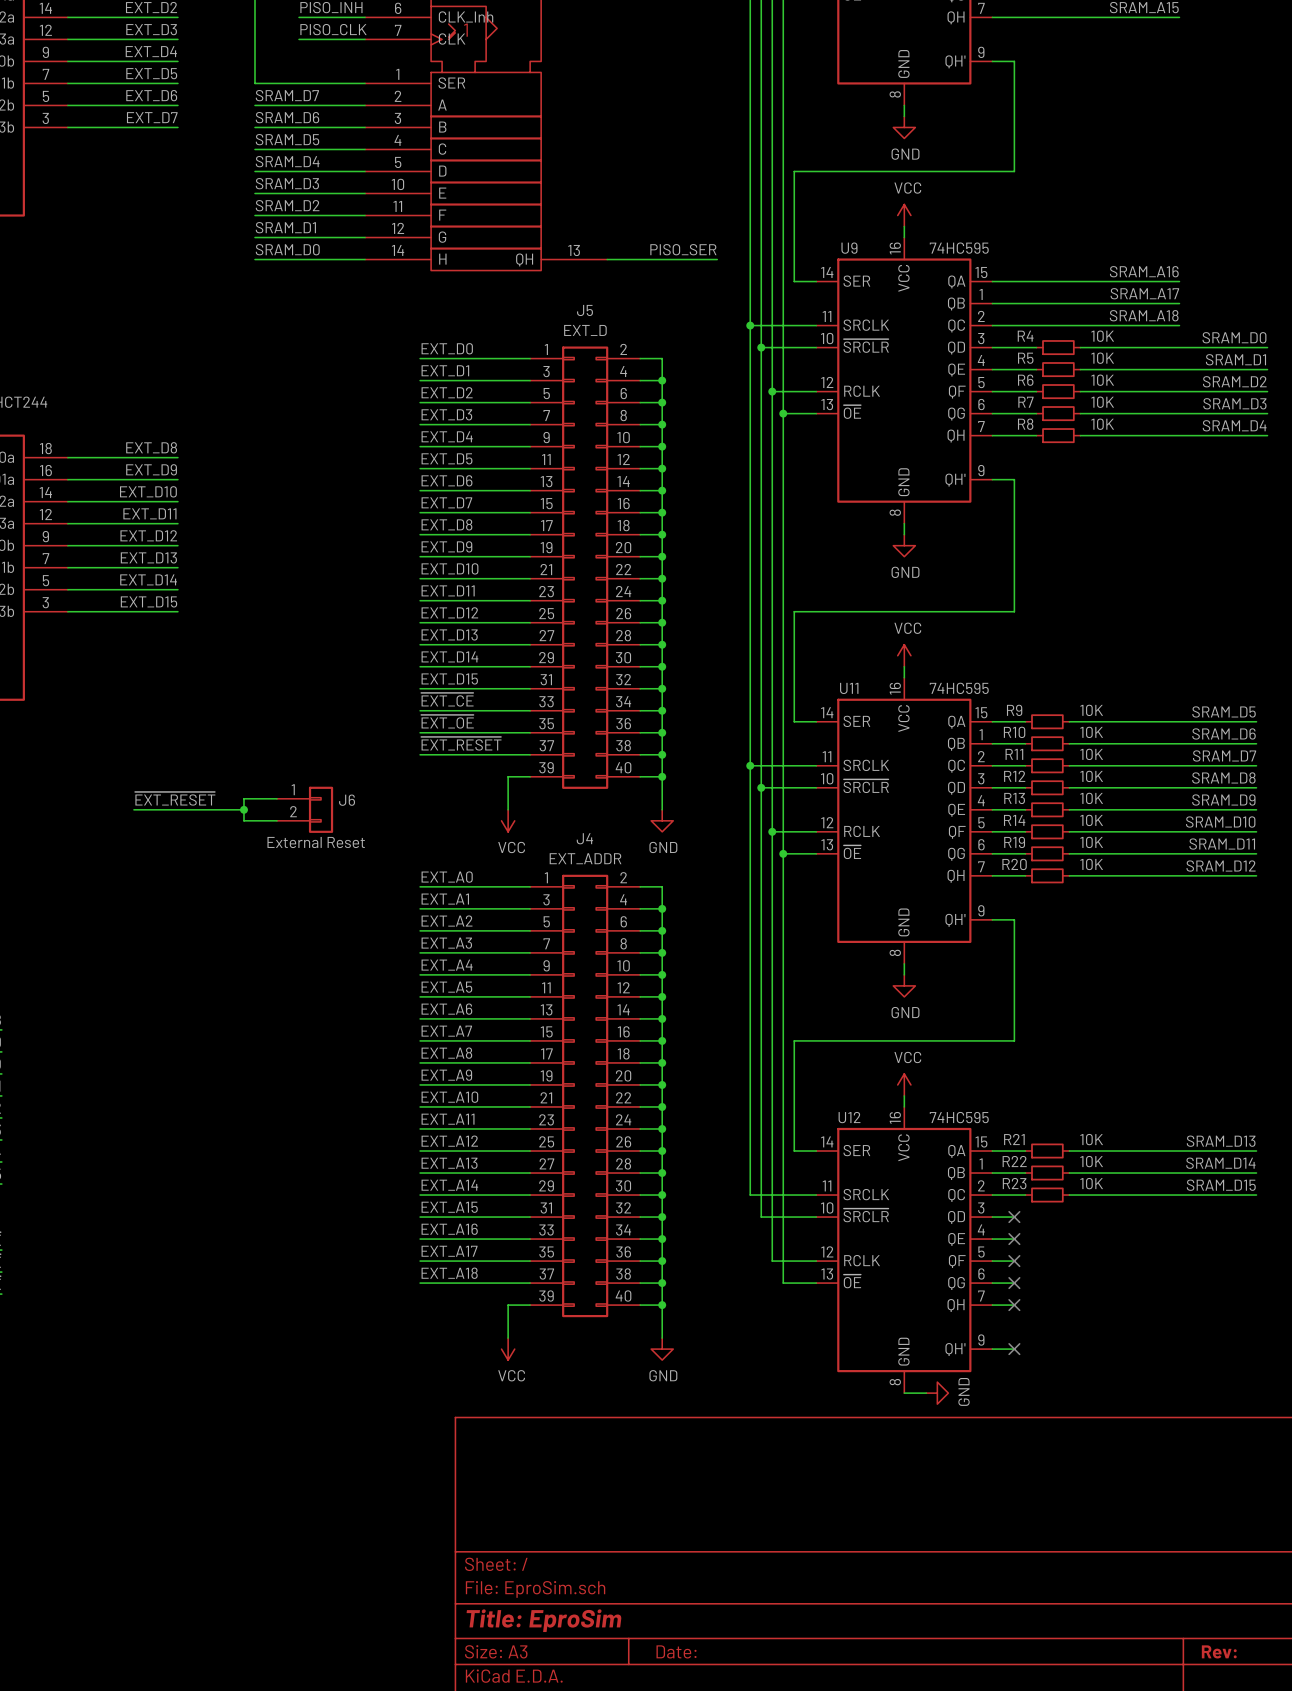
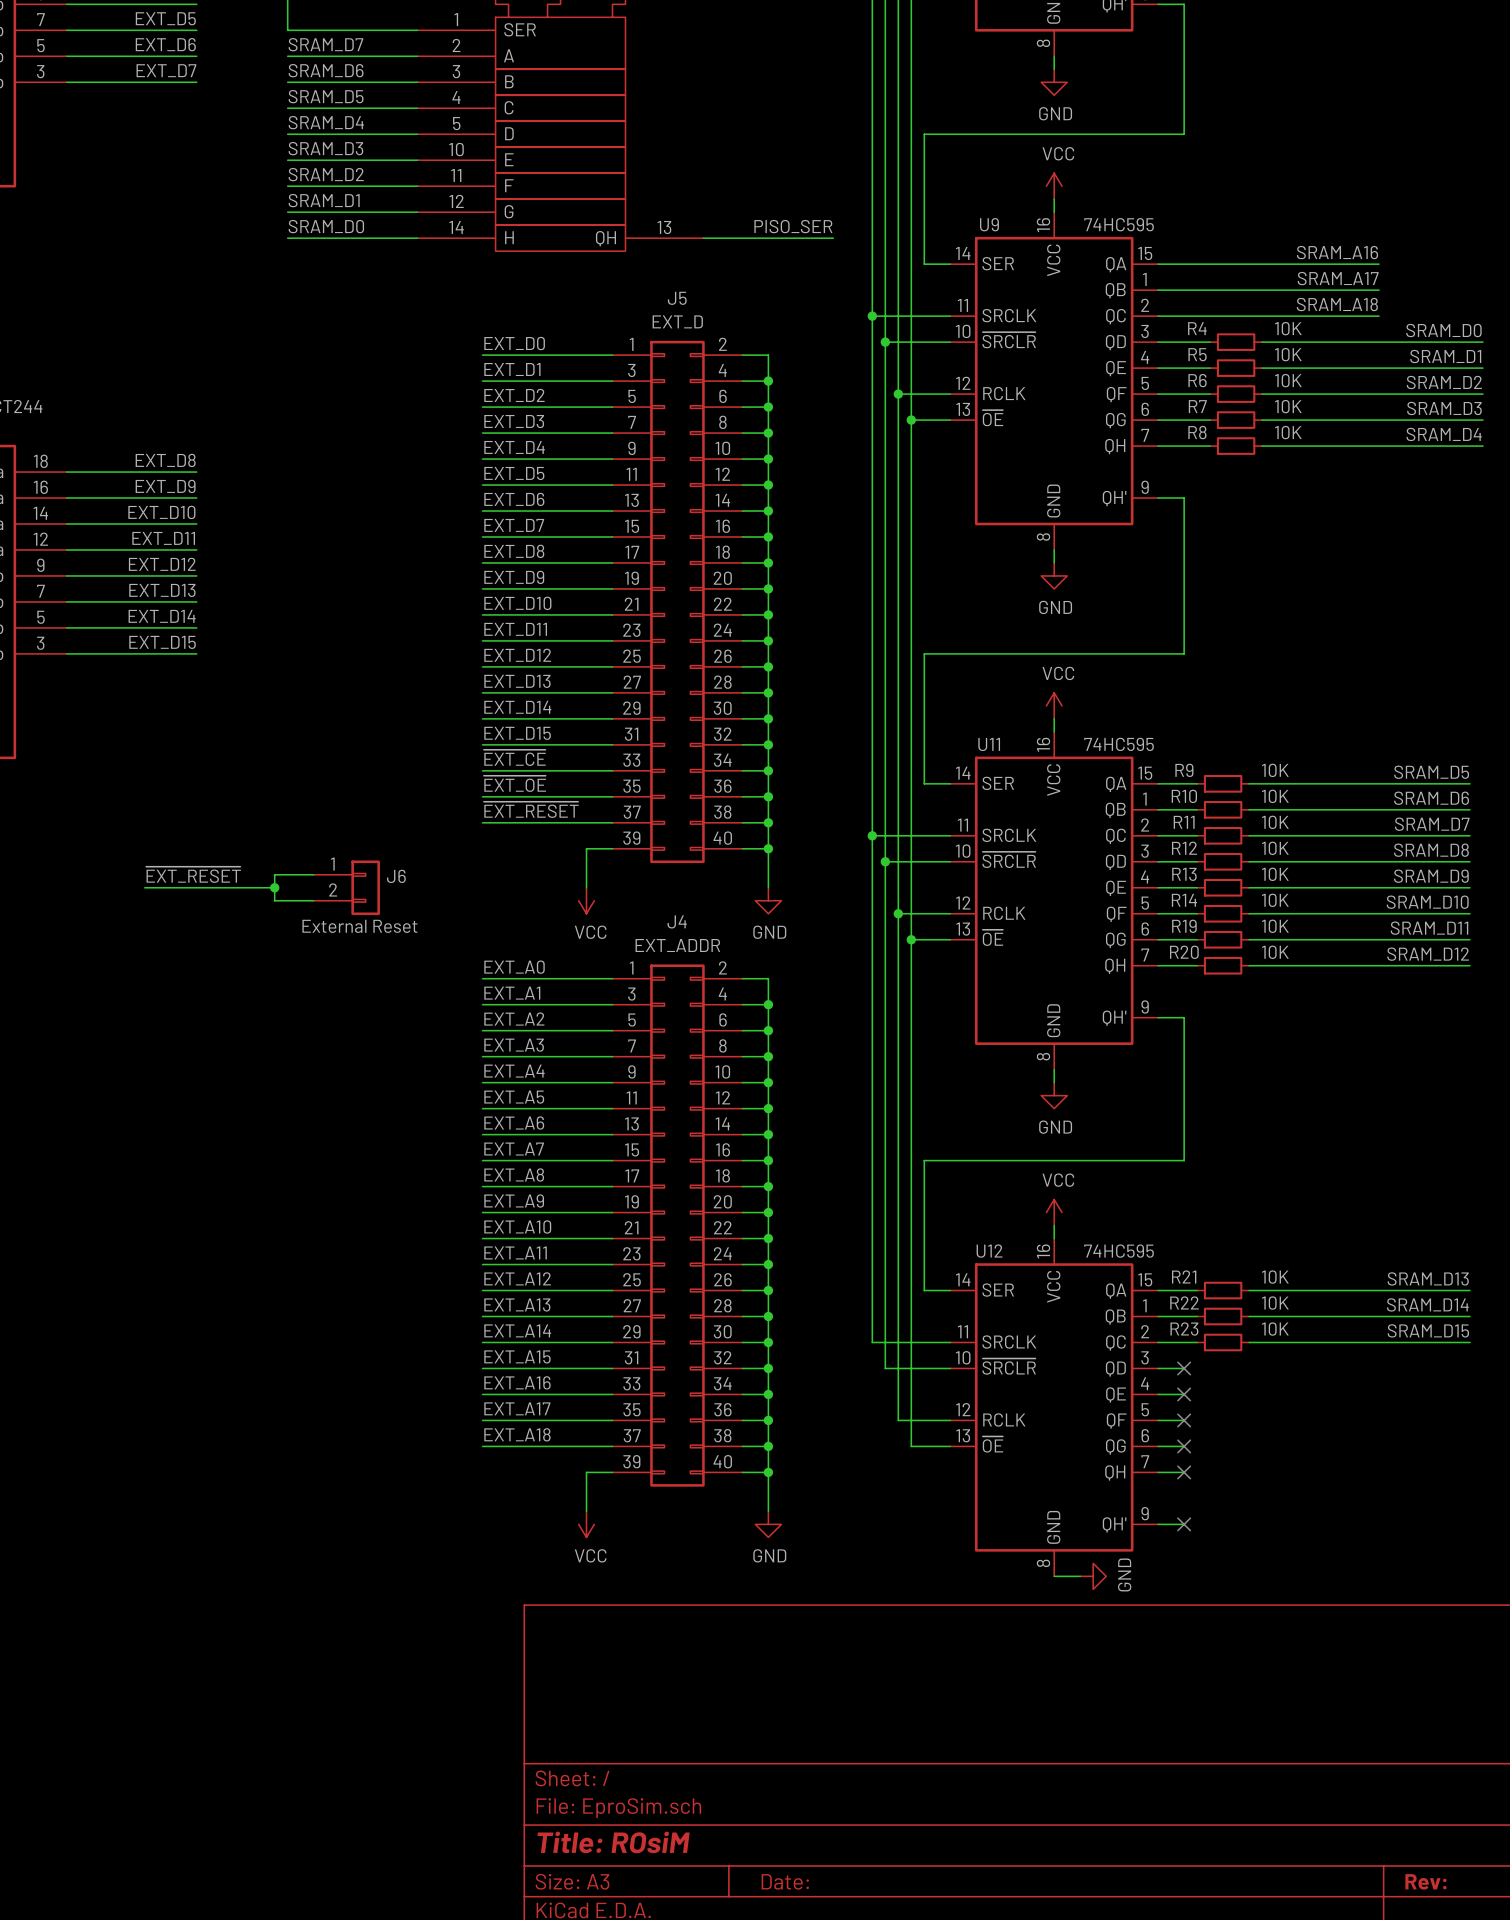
title block: Title: EproSim (544, 1620) -> Title: ROsiM (613, 1842)

